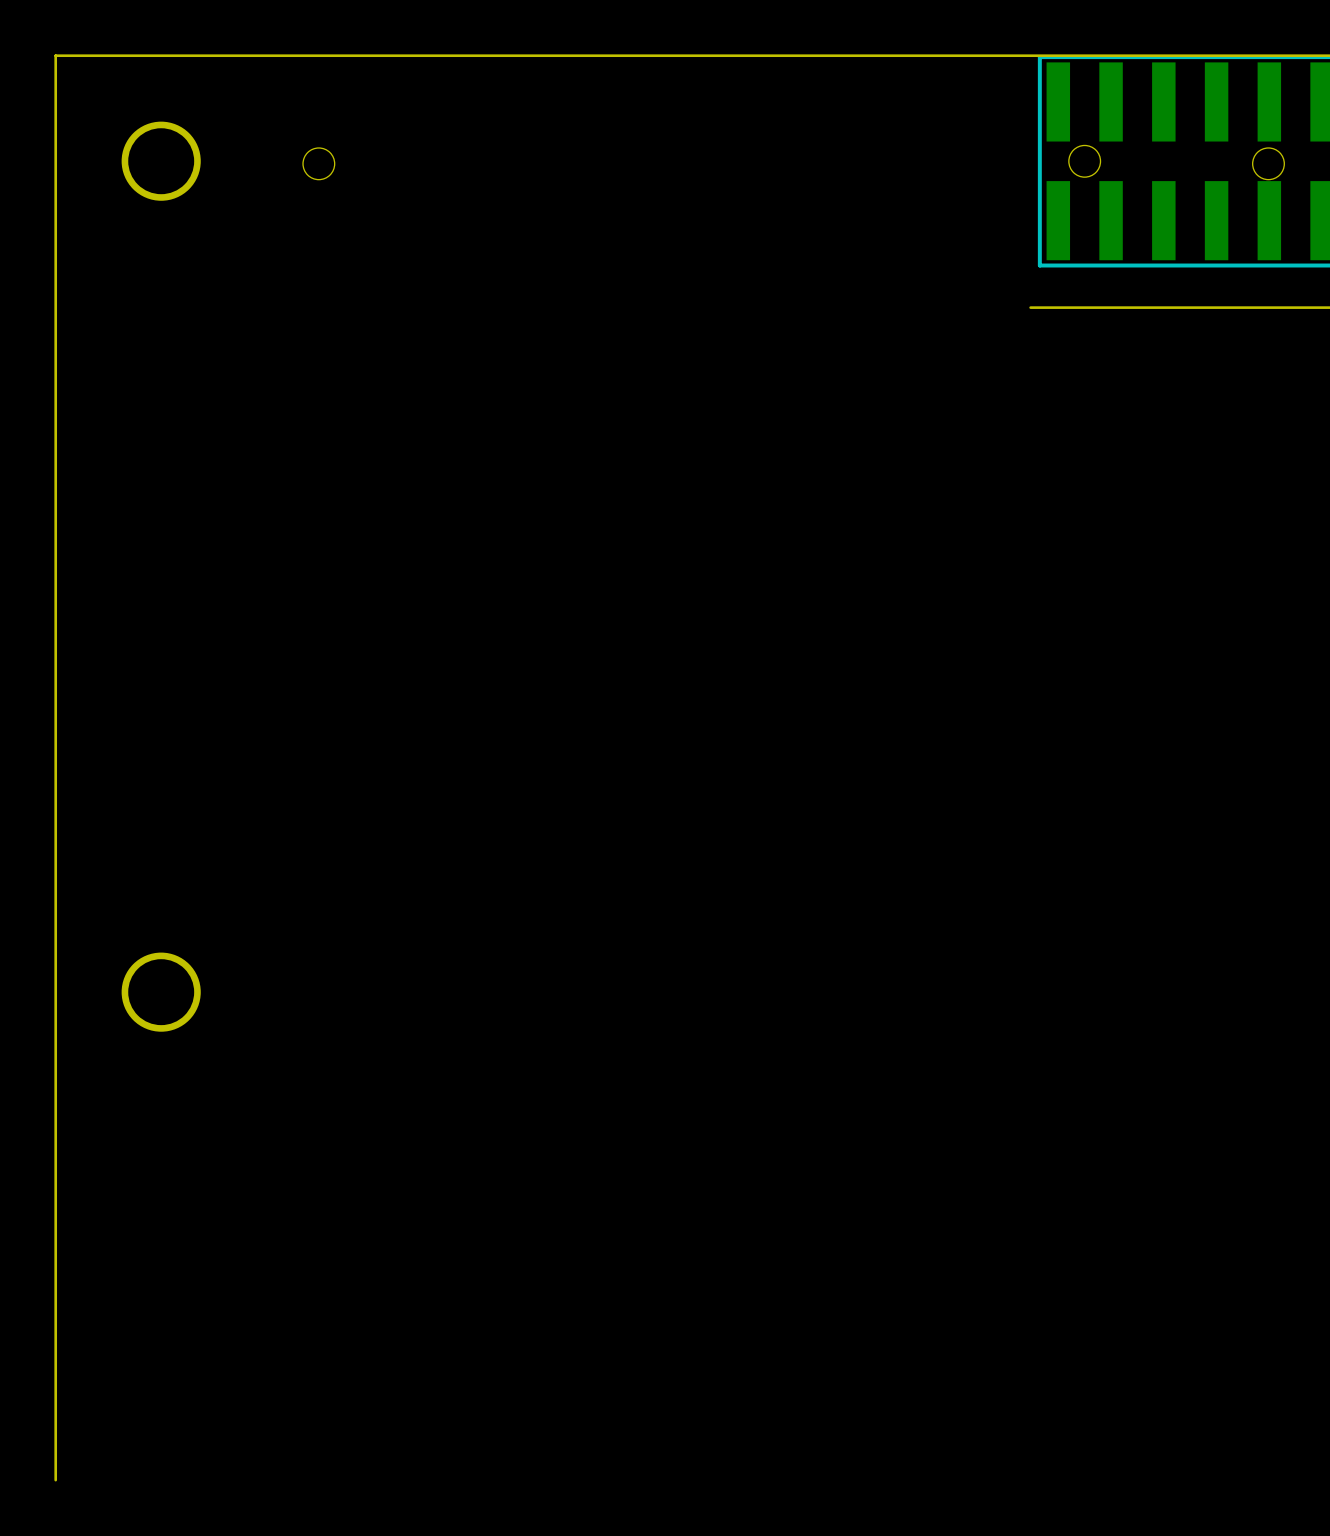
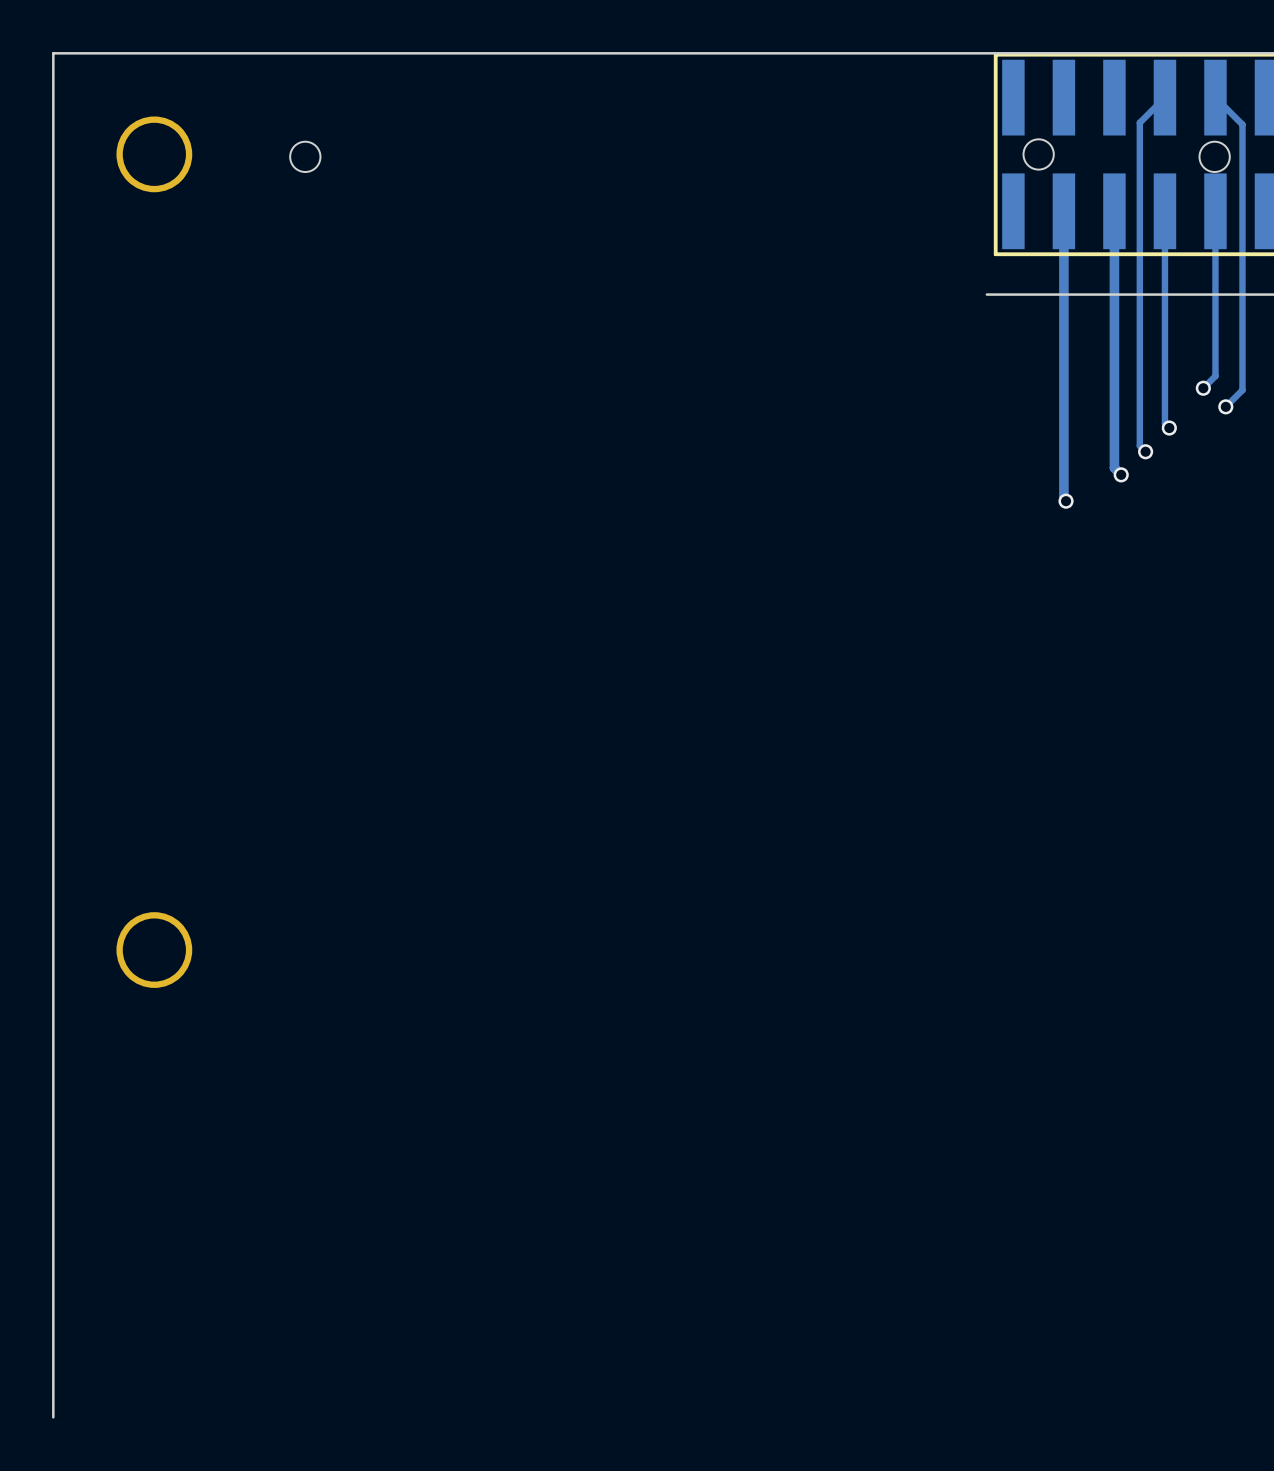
track: none -> (1164, 97) (1139, 122) (1139, 445) (1145, 451)
track: none -> (1215, 97) (1242, 124) (1242, 390) (1225, 406)
track: none -> (1063, 211) (1063, 499) (1066, 501)
track: none -> (1114, 211) (1114, 468) (1121, 474)
track: none -> (1164, 211) (1164, 423) (1169, 428)
track: none -> (1215, 211) (1215, 376) (1203, 388)
via: none -> (1203, 388)
via: none -> (1225, 406)
via: none -> (1169, 428)
via: none -> (1145, 451)
via: none -> (1121, 474)
via: none -> (1066, 501)

